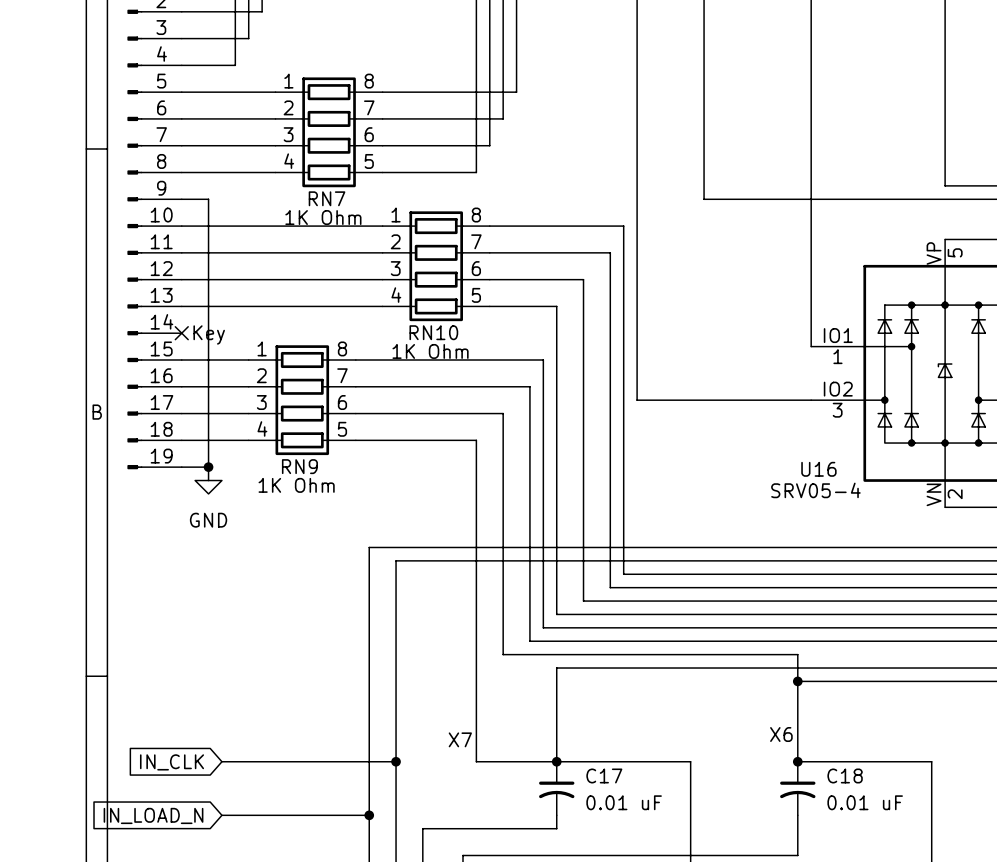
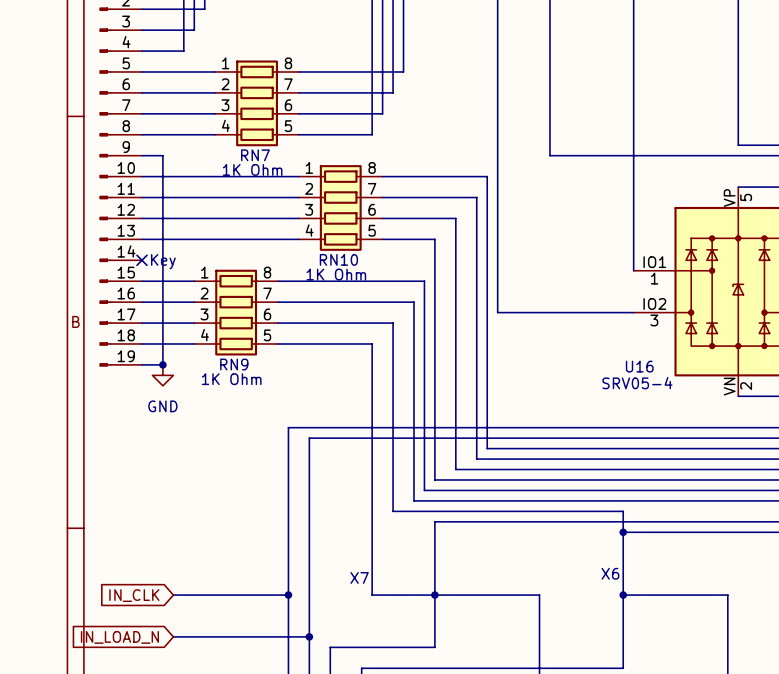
wire: (369, 761) (396, 761) -> (288, 636) (309, 636)
junction: none -> (288, 595)
junction: (396, 761) -> none
C17: 0.01 uF (556, 788) -> none
C18: 0.01 uF (797, 788) -> none
junction: (369, 815) -> none
junction: none -> (309, 636)

